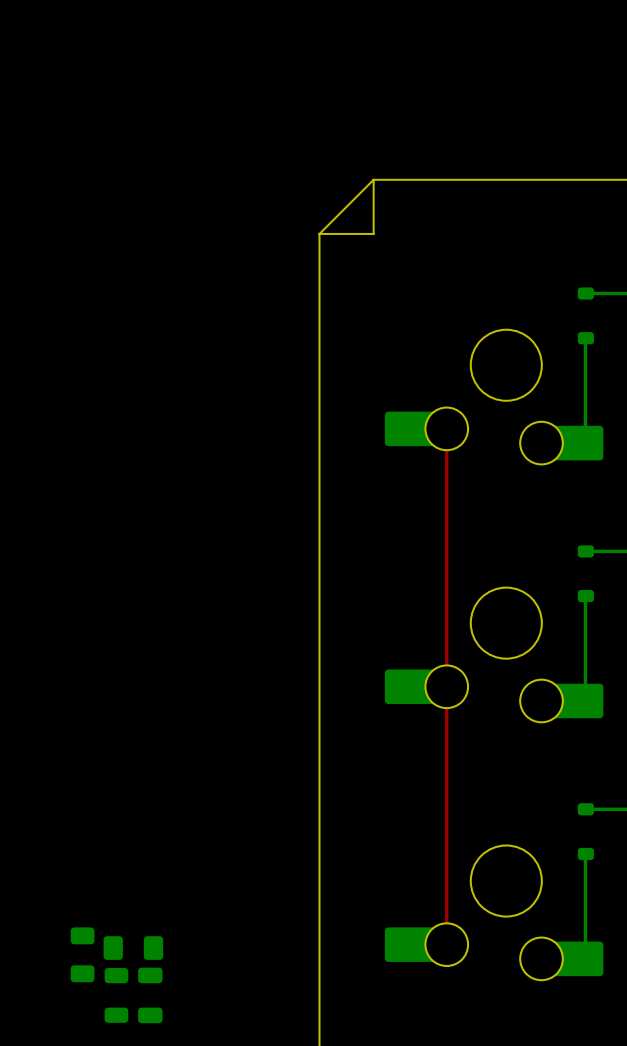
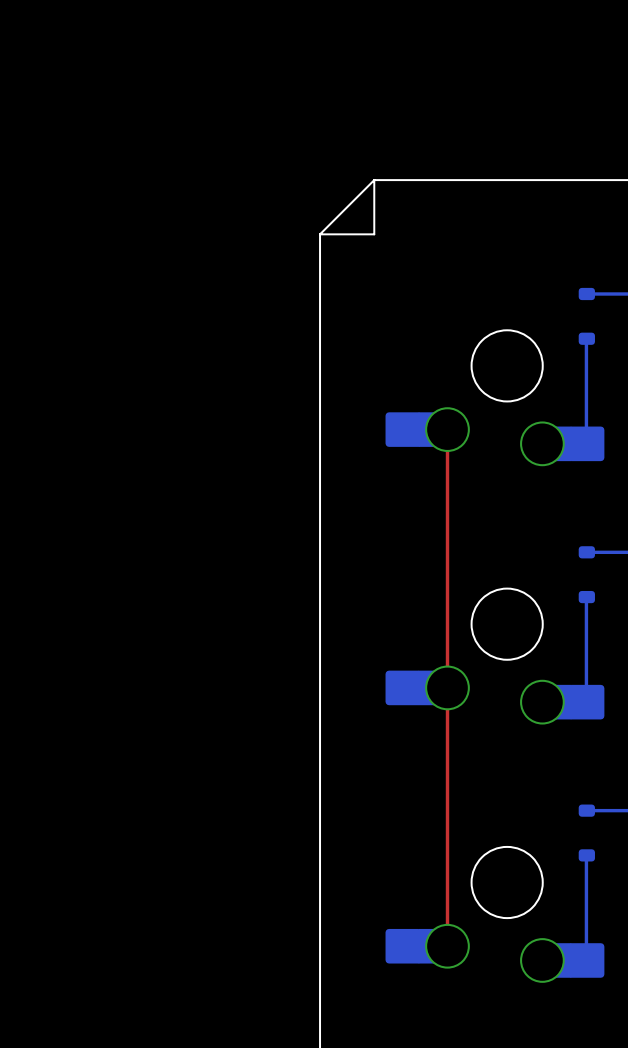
part: (133, 948) -> none
part: (82, 954) -> none
part: (116, 995) -> none
part: (150, 995) -> none

